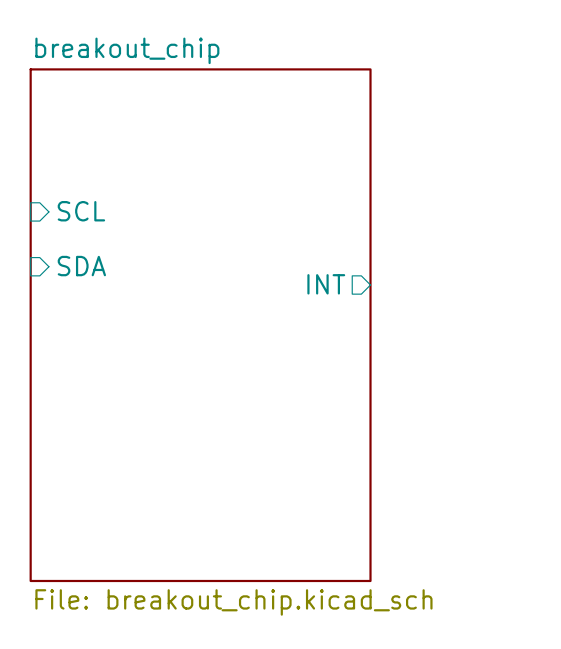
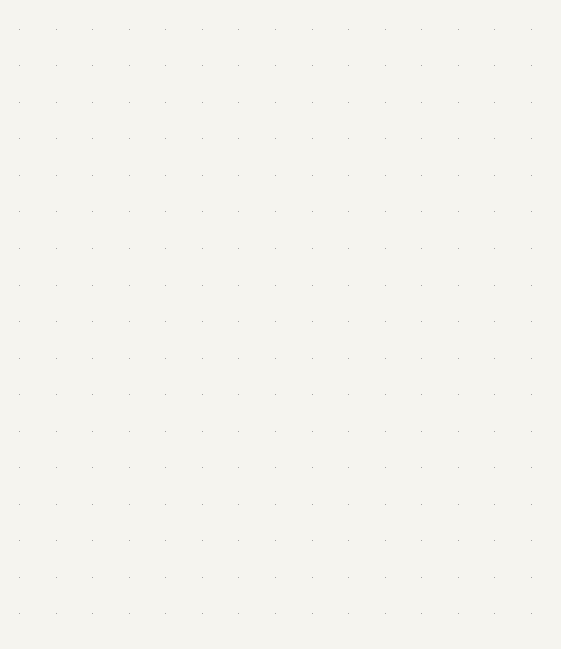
sheet pin: SCL (81, 211) -> none
sheet pin: SDA (81, 266) -> none
sheet pin: INT (326, 284) -> none
sheet breakout_chip: File: breakout_chip.kicad_sch (200, 325) -> none

